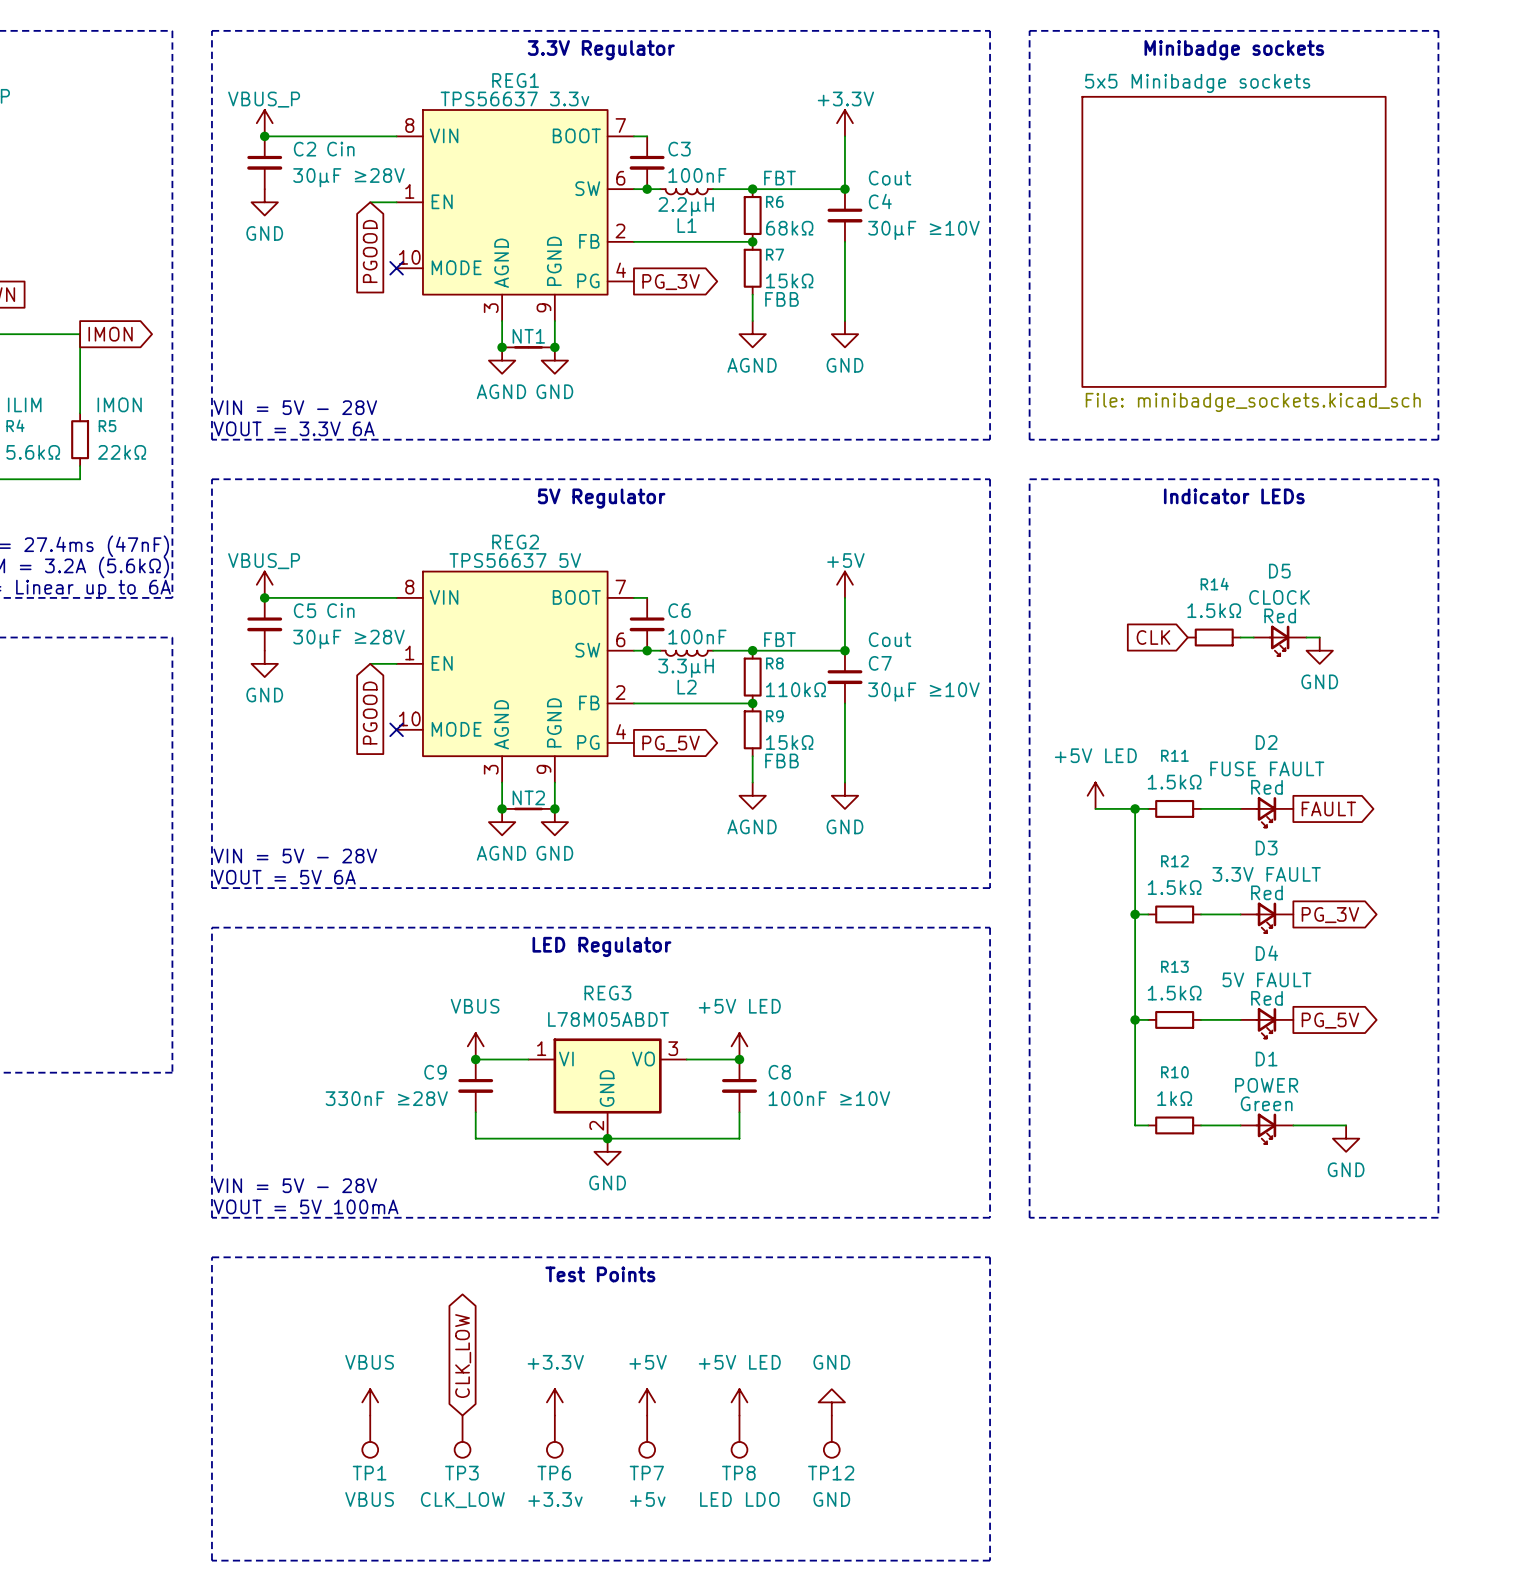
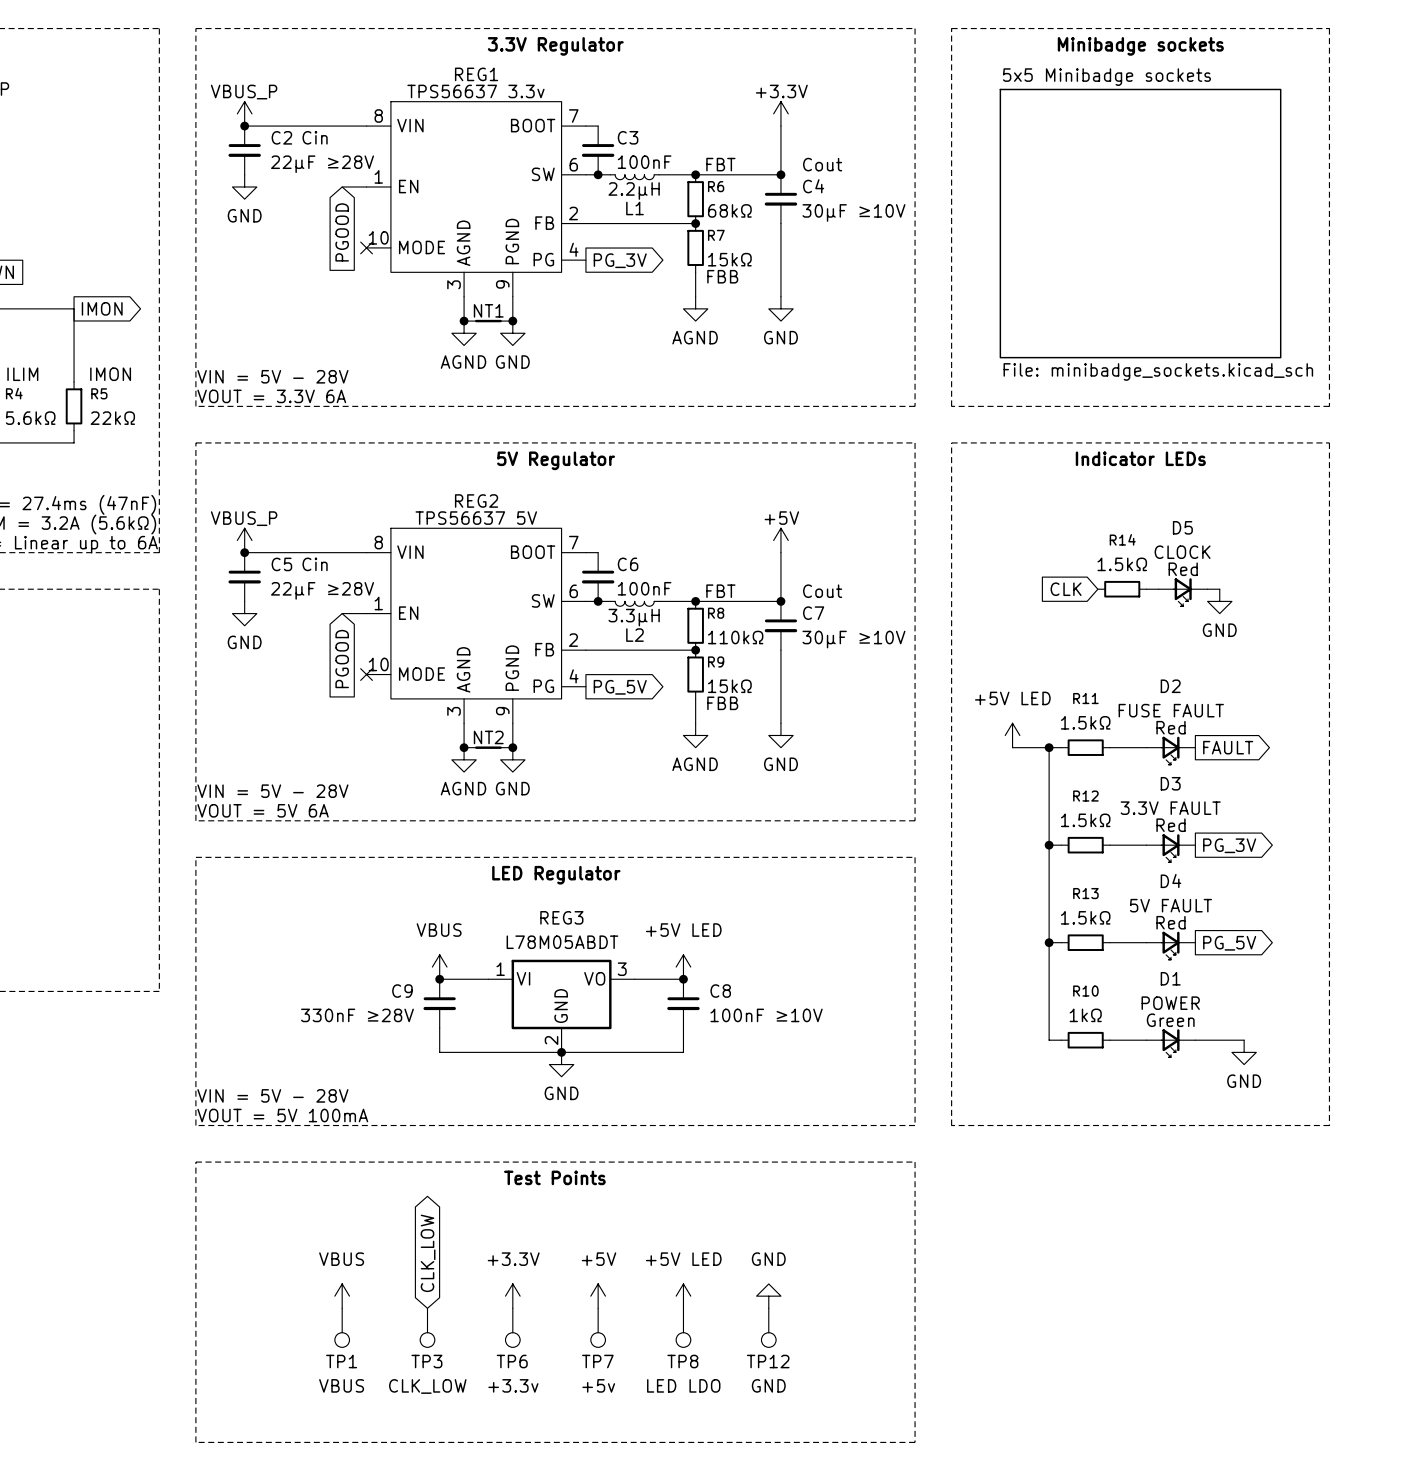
C2 value: 30μF ≥28V (348, 177) -> 22μF ≥28V (322, 164)
C5 value: 30μF ≥28V (348, 639) -> 22μF ≥28V (322, 590)

